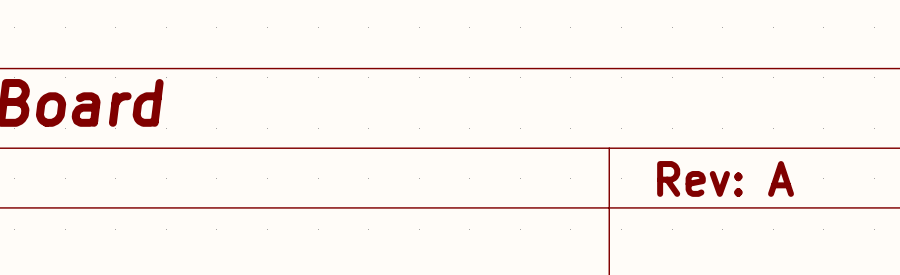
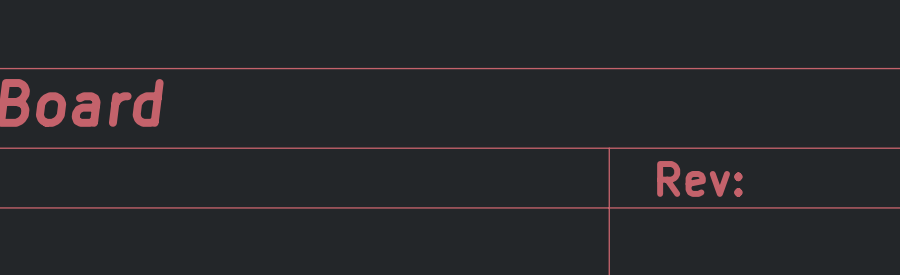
title block: Rev: A (725, 178) -> Rev: (699, 178)

